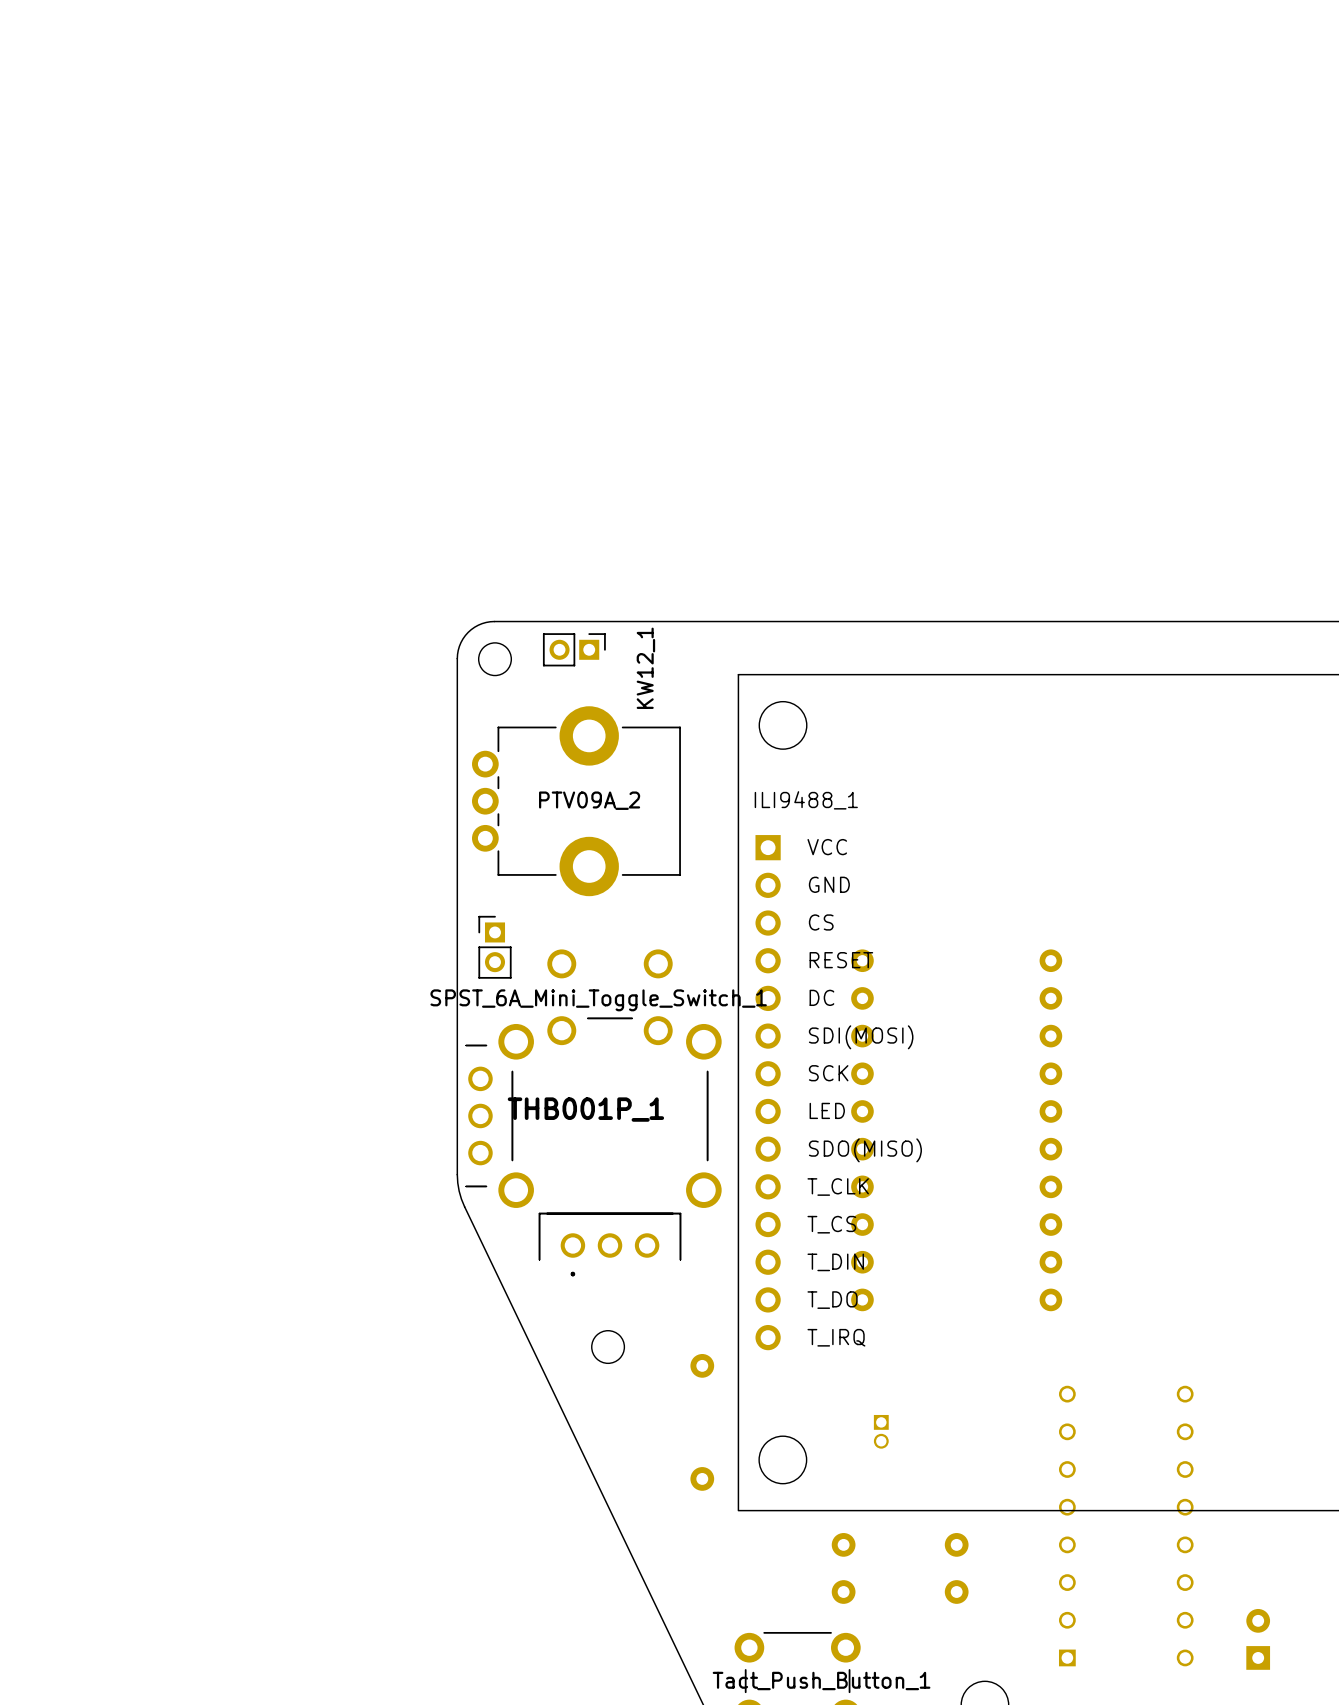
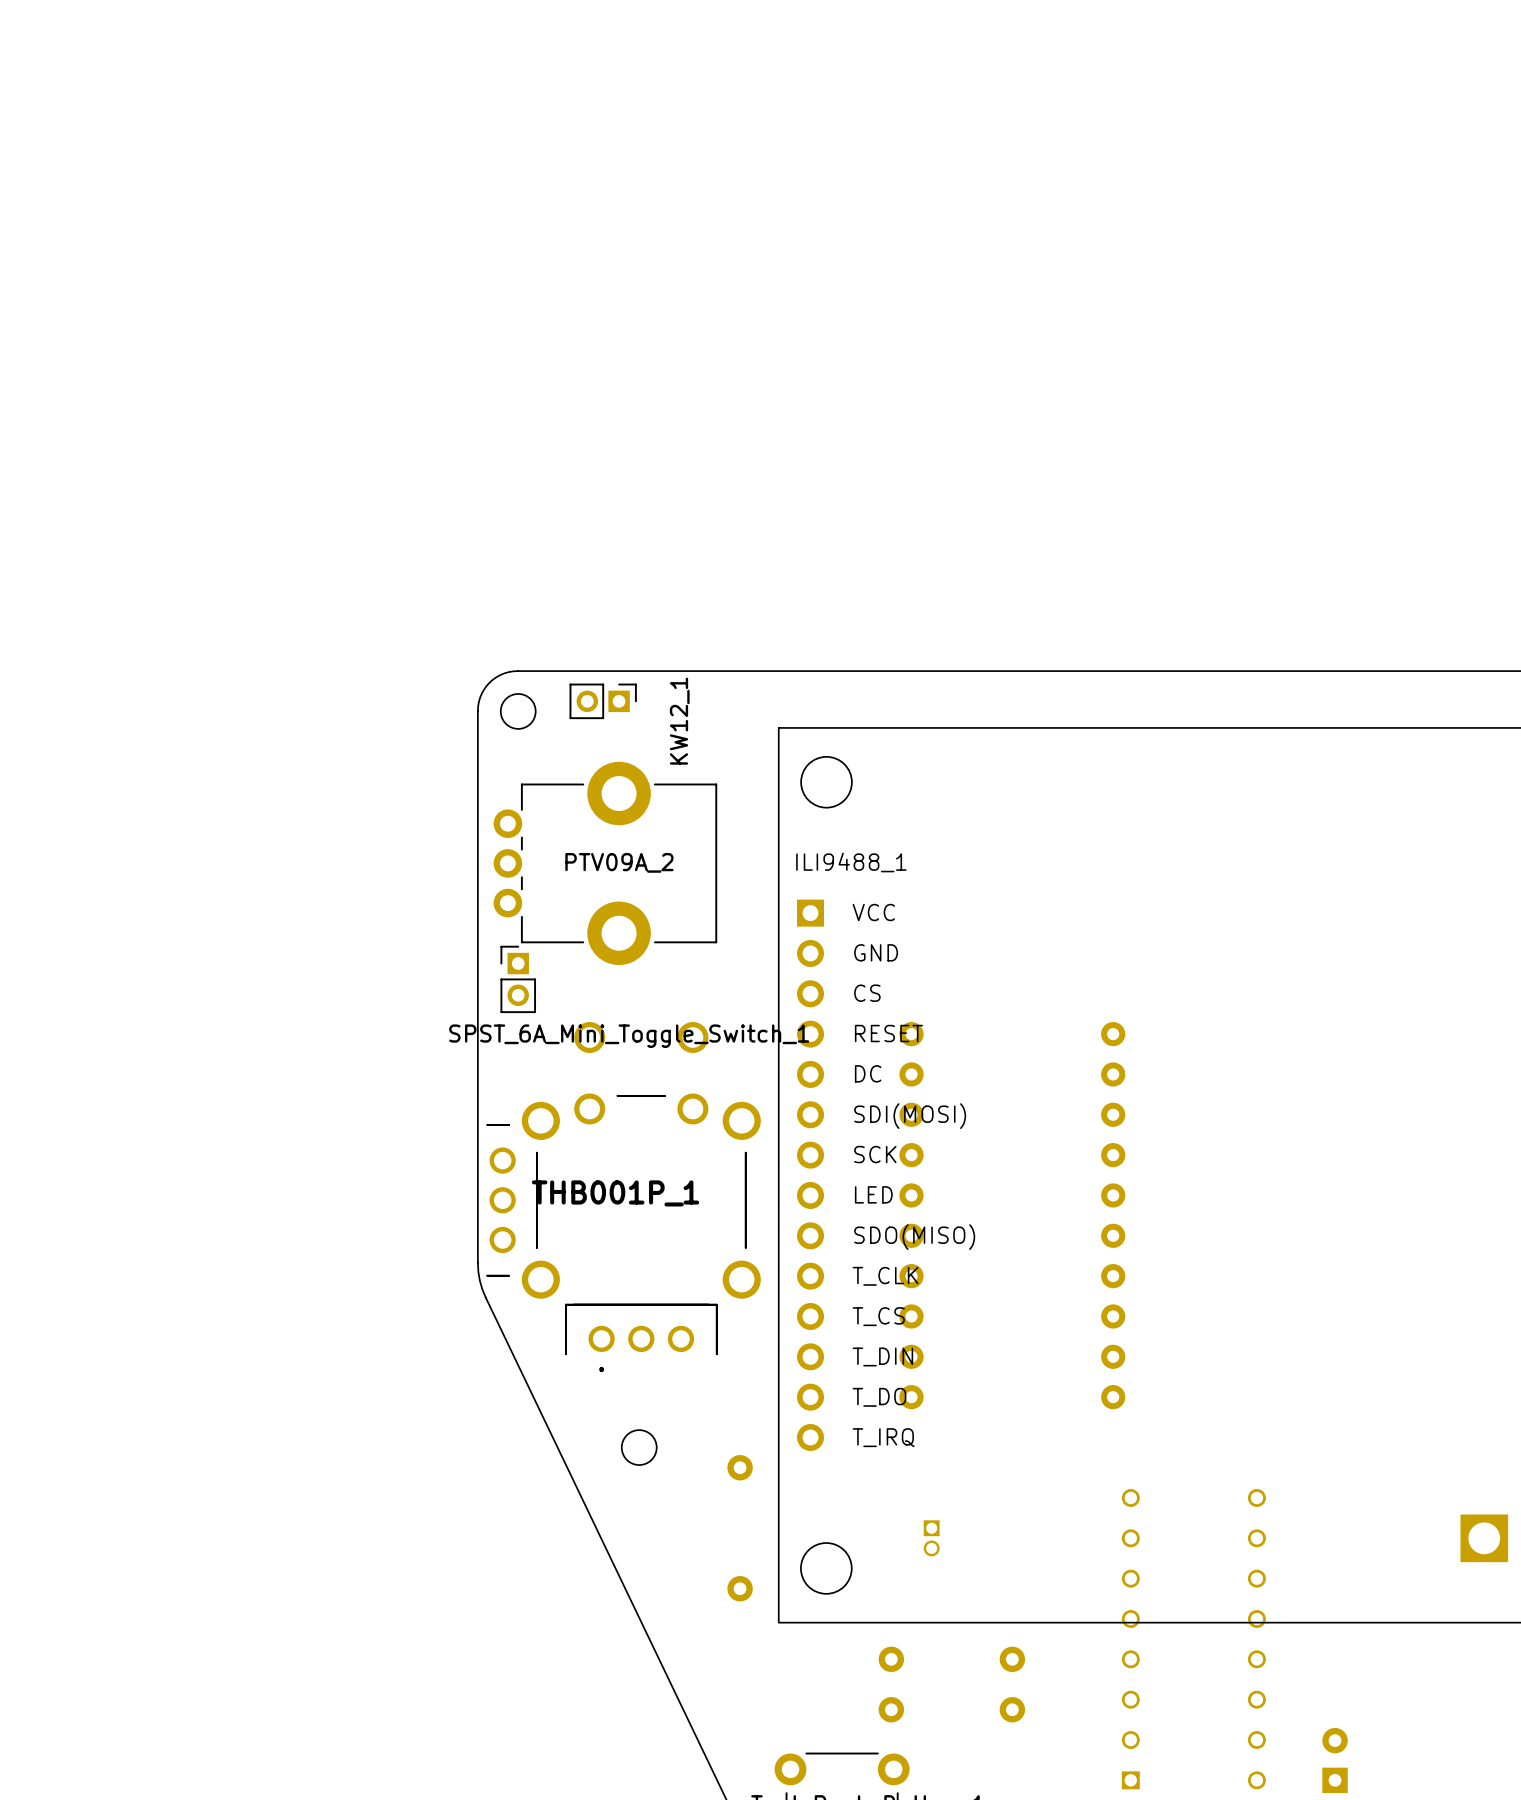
SPST_6A_Mini_Toggle_Switch_1 position: (495, 947) -> (518, 979)

